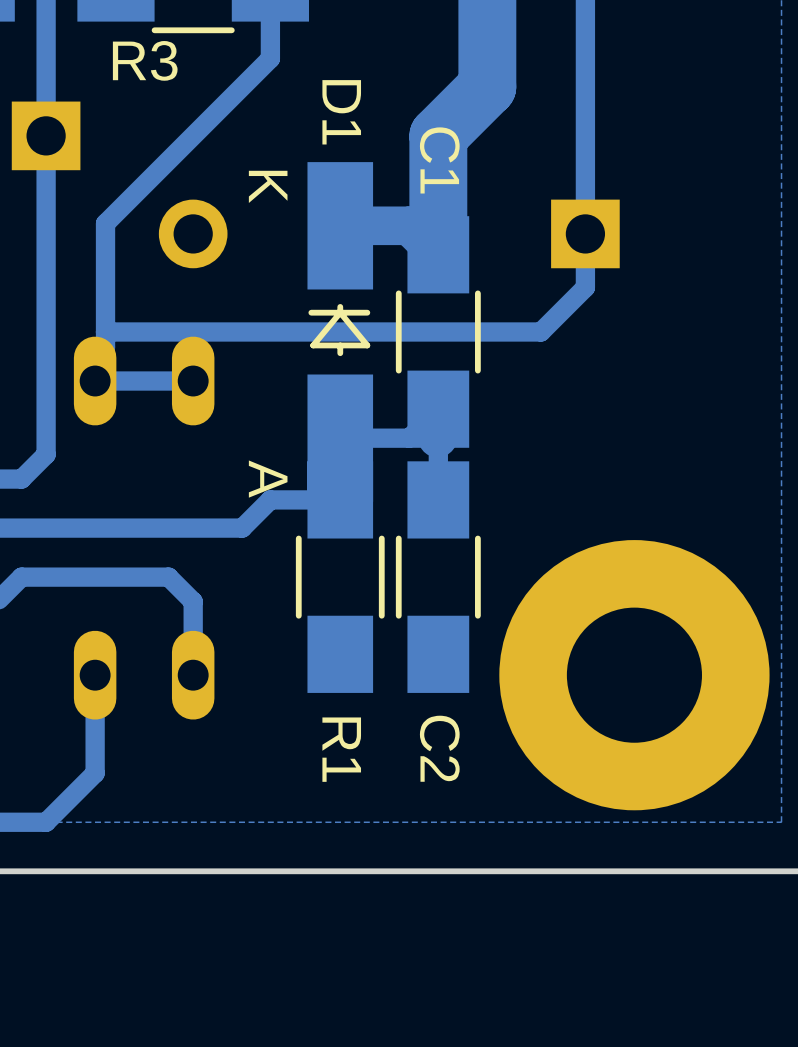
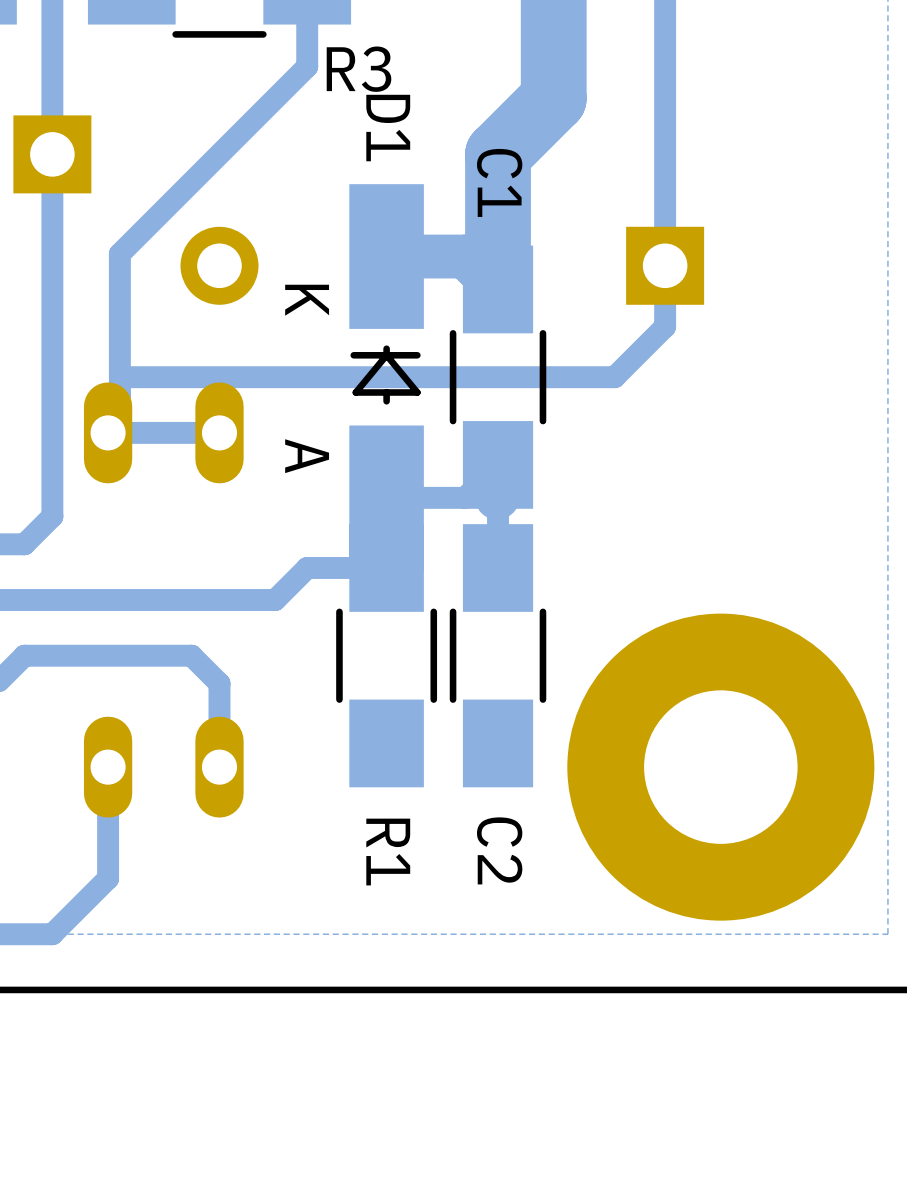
R3 name position: R3 (145, 60) -> R3 (359, 69)
D1 text position: K (268, 186) -> K (307, 300)
D1 text position: A (268, 479) -> A (307, 456)

